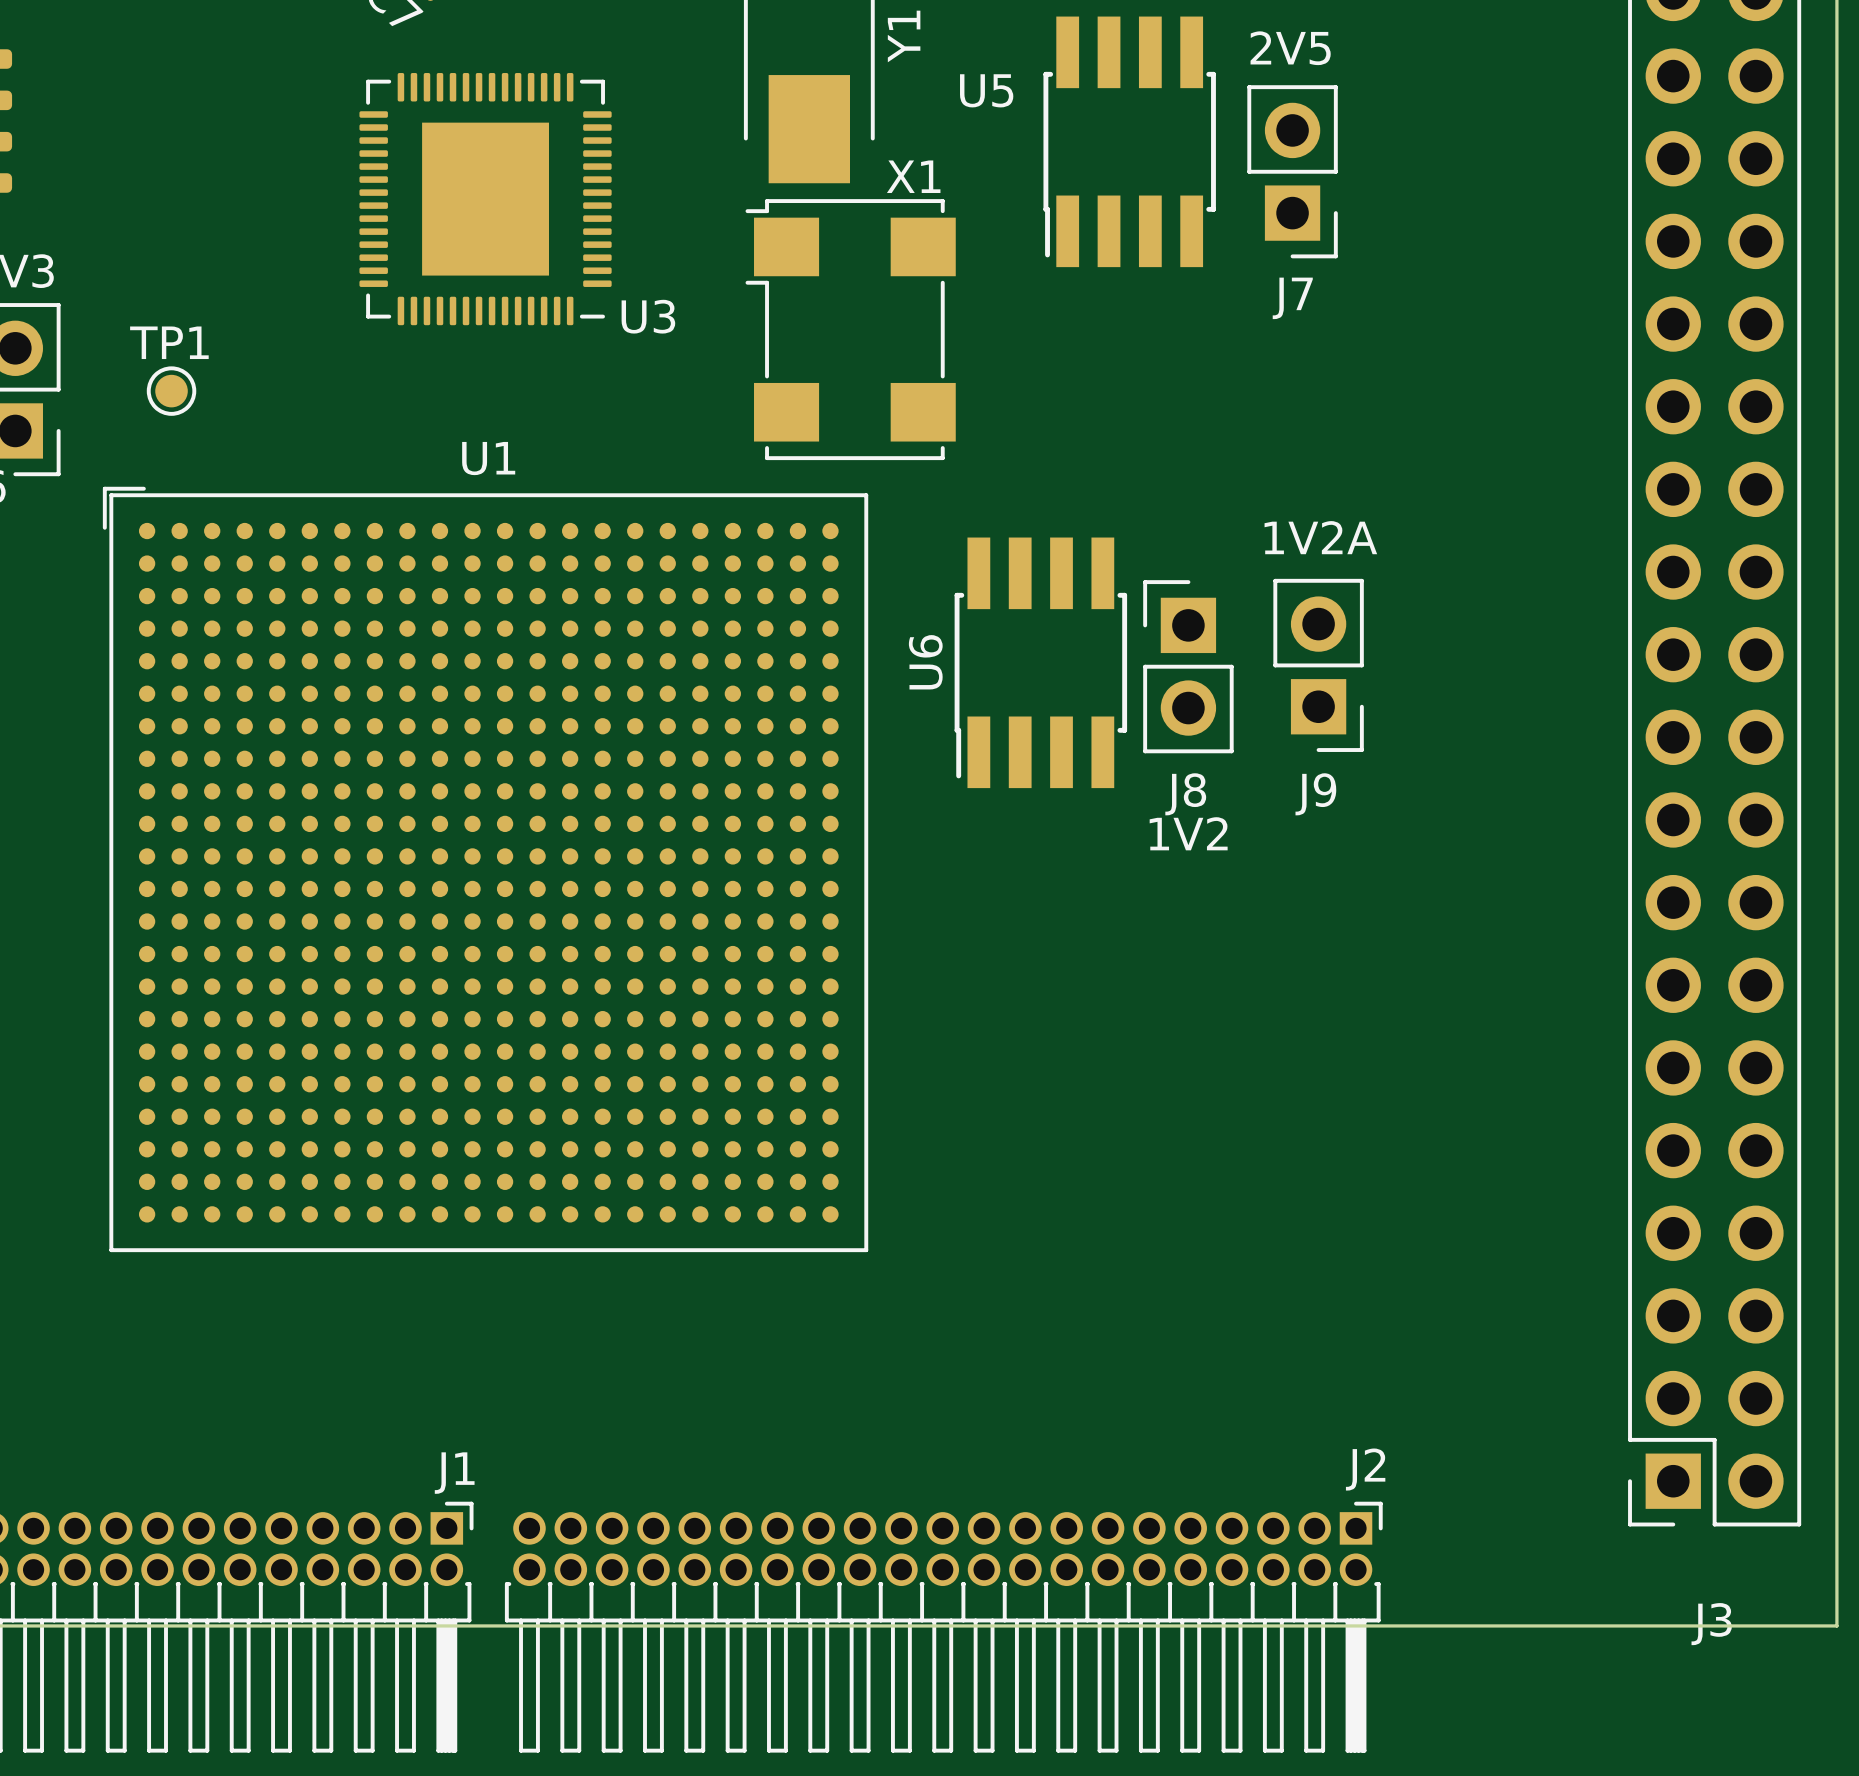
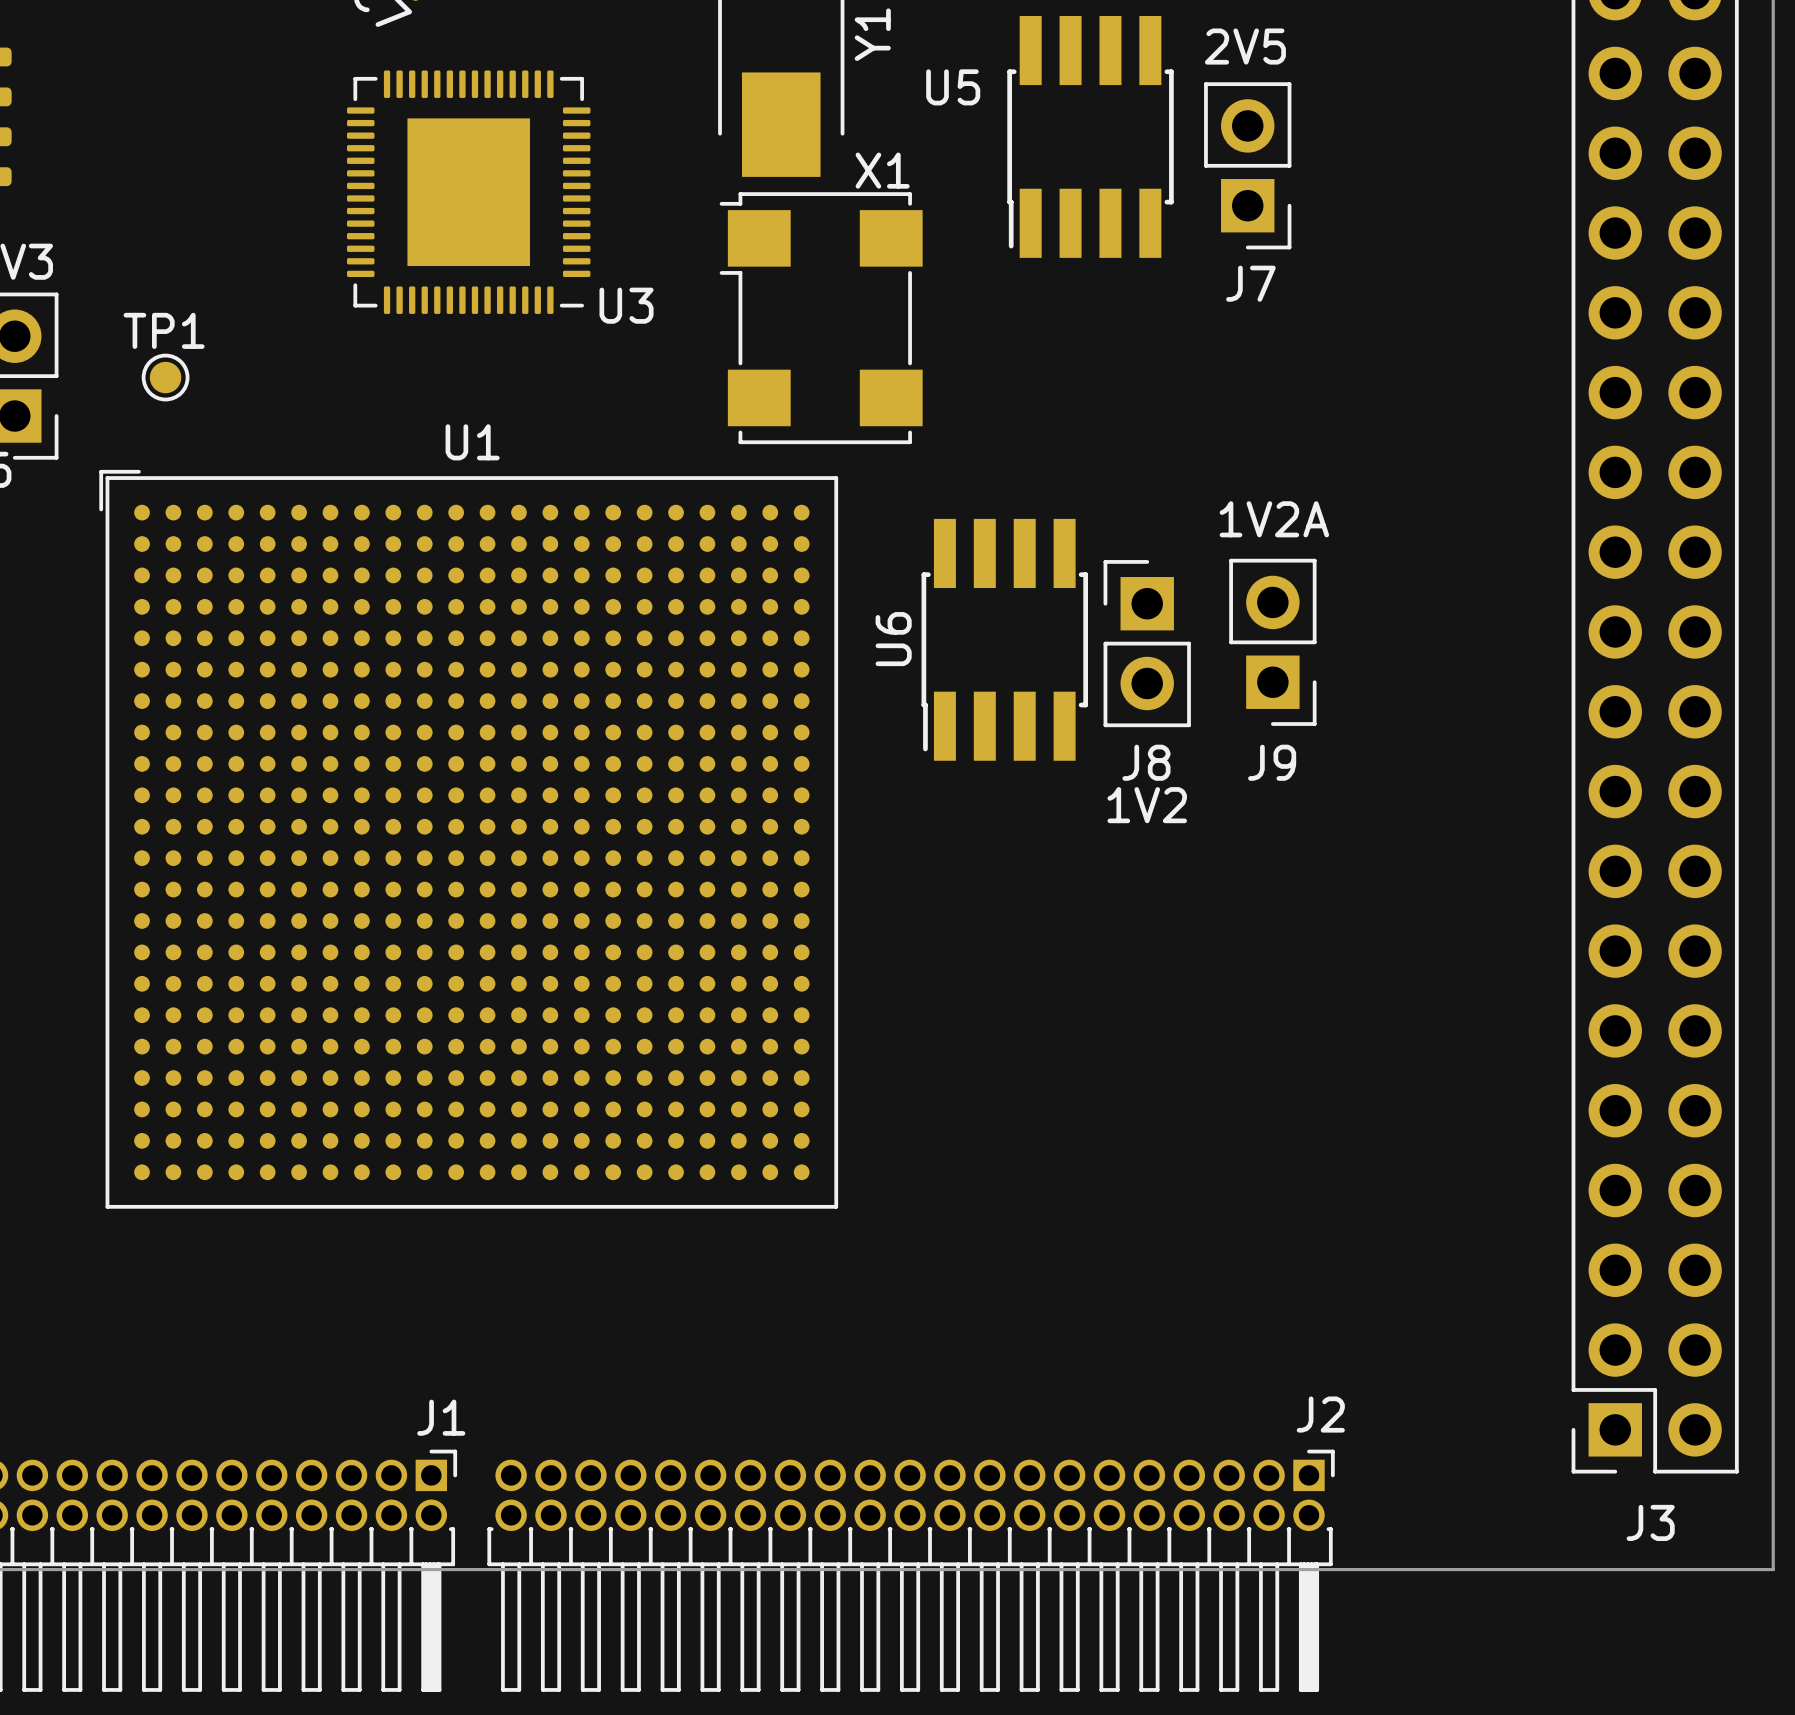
J3 name position: J3 (1711, 1624) -> J3 (1650, 1522)

